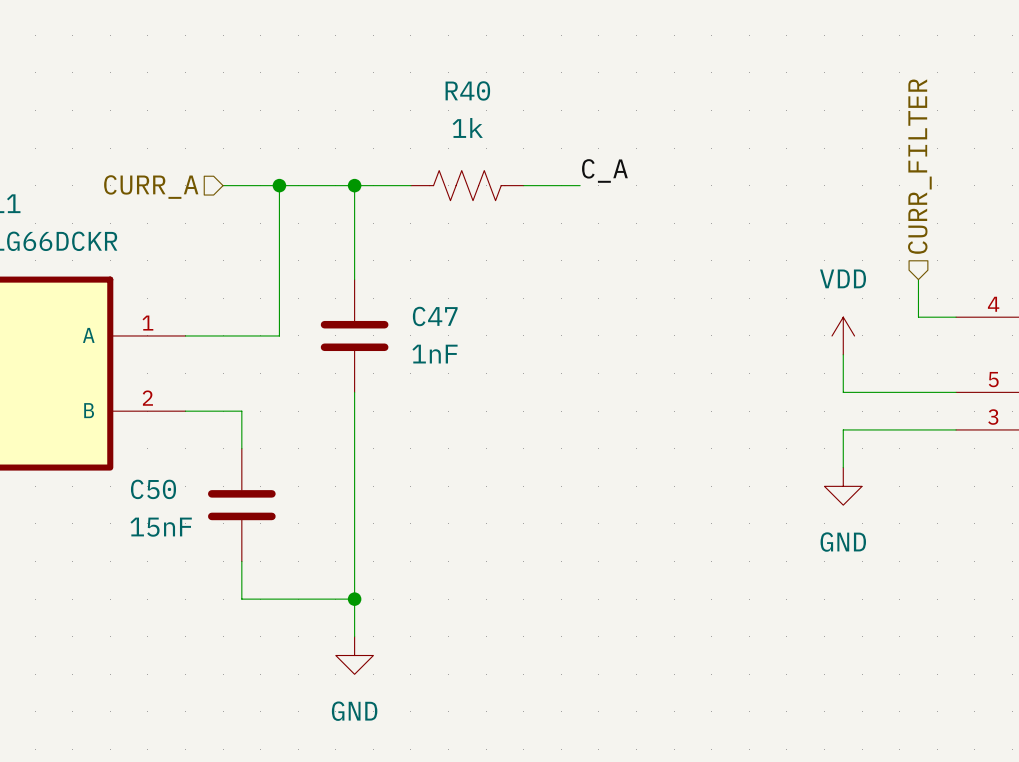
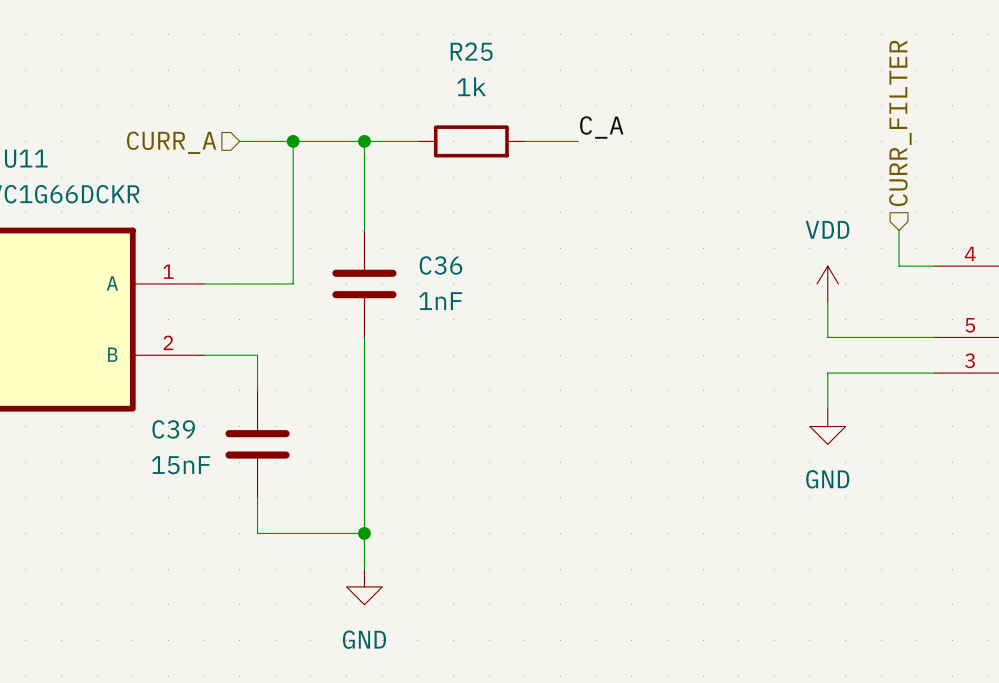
R40: 1k (467, 185) -> none
R25: none -> 1k (471, 141)
C47 name: C47 (435, 316) -> C36 (440, 265)
C50 name: C50 (153, 489) -> C39 (173, 429)

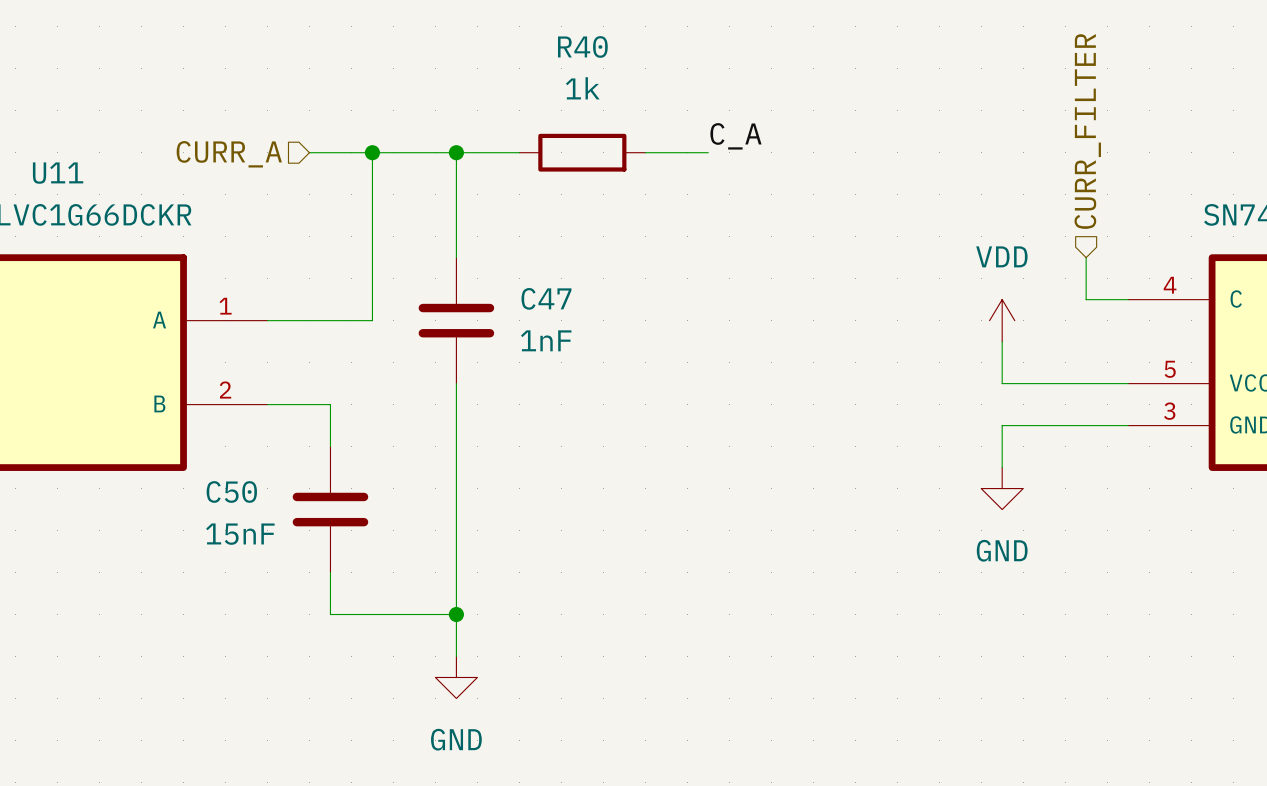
R25 name: R25 (471, 51) -> R40 (582, 46)
C36 name: C36 (440, 265) -> C47 (546, 298)
C39 name: C39 (173, 429) -> C50 (231, 491)

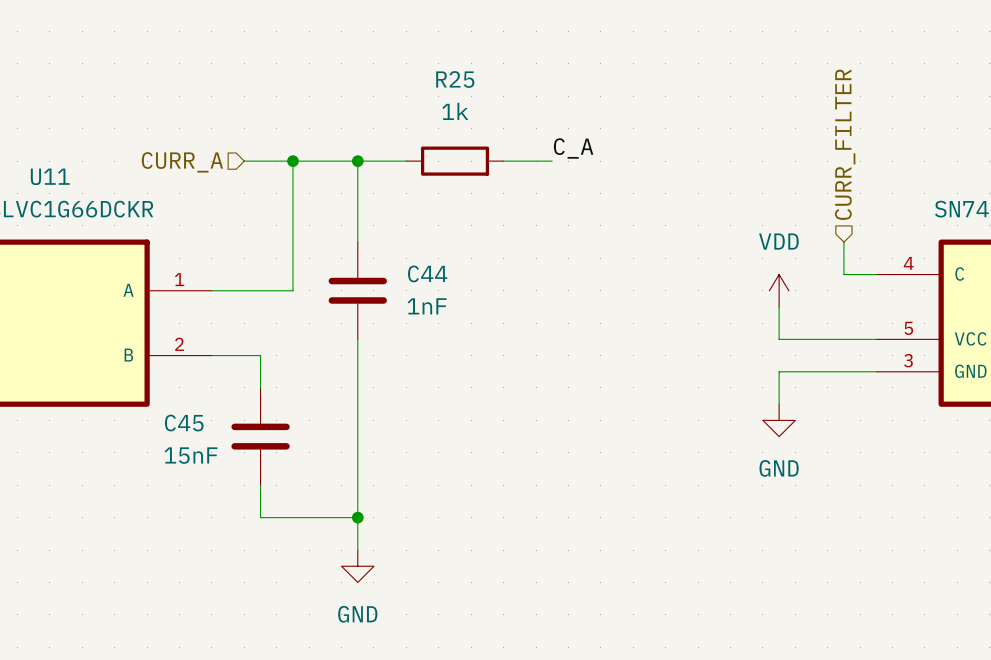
R40 name: R40 (582, 46) -> R25 (455, 79)
C47 name: C47 (546, 298) -> C44 (427, 273)
C50 name: C50 (231, 491) -> C45 (184, 423)

